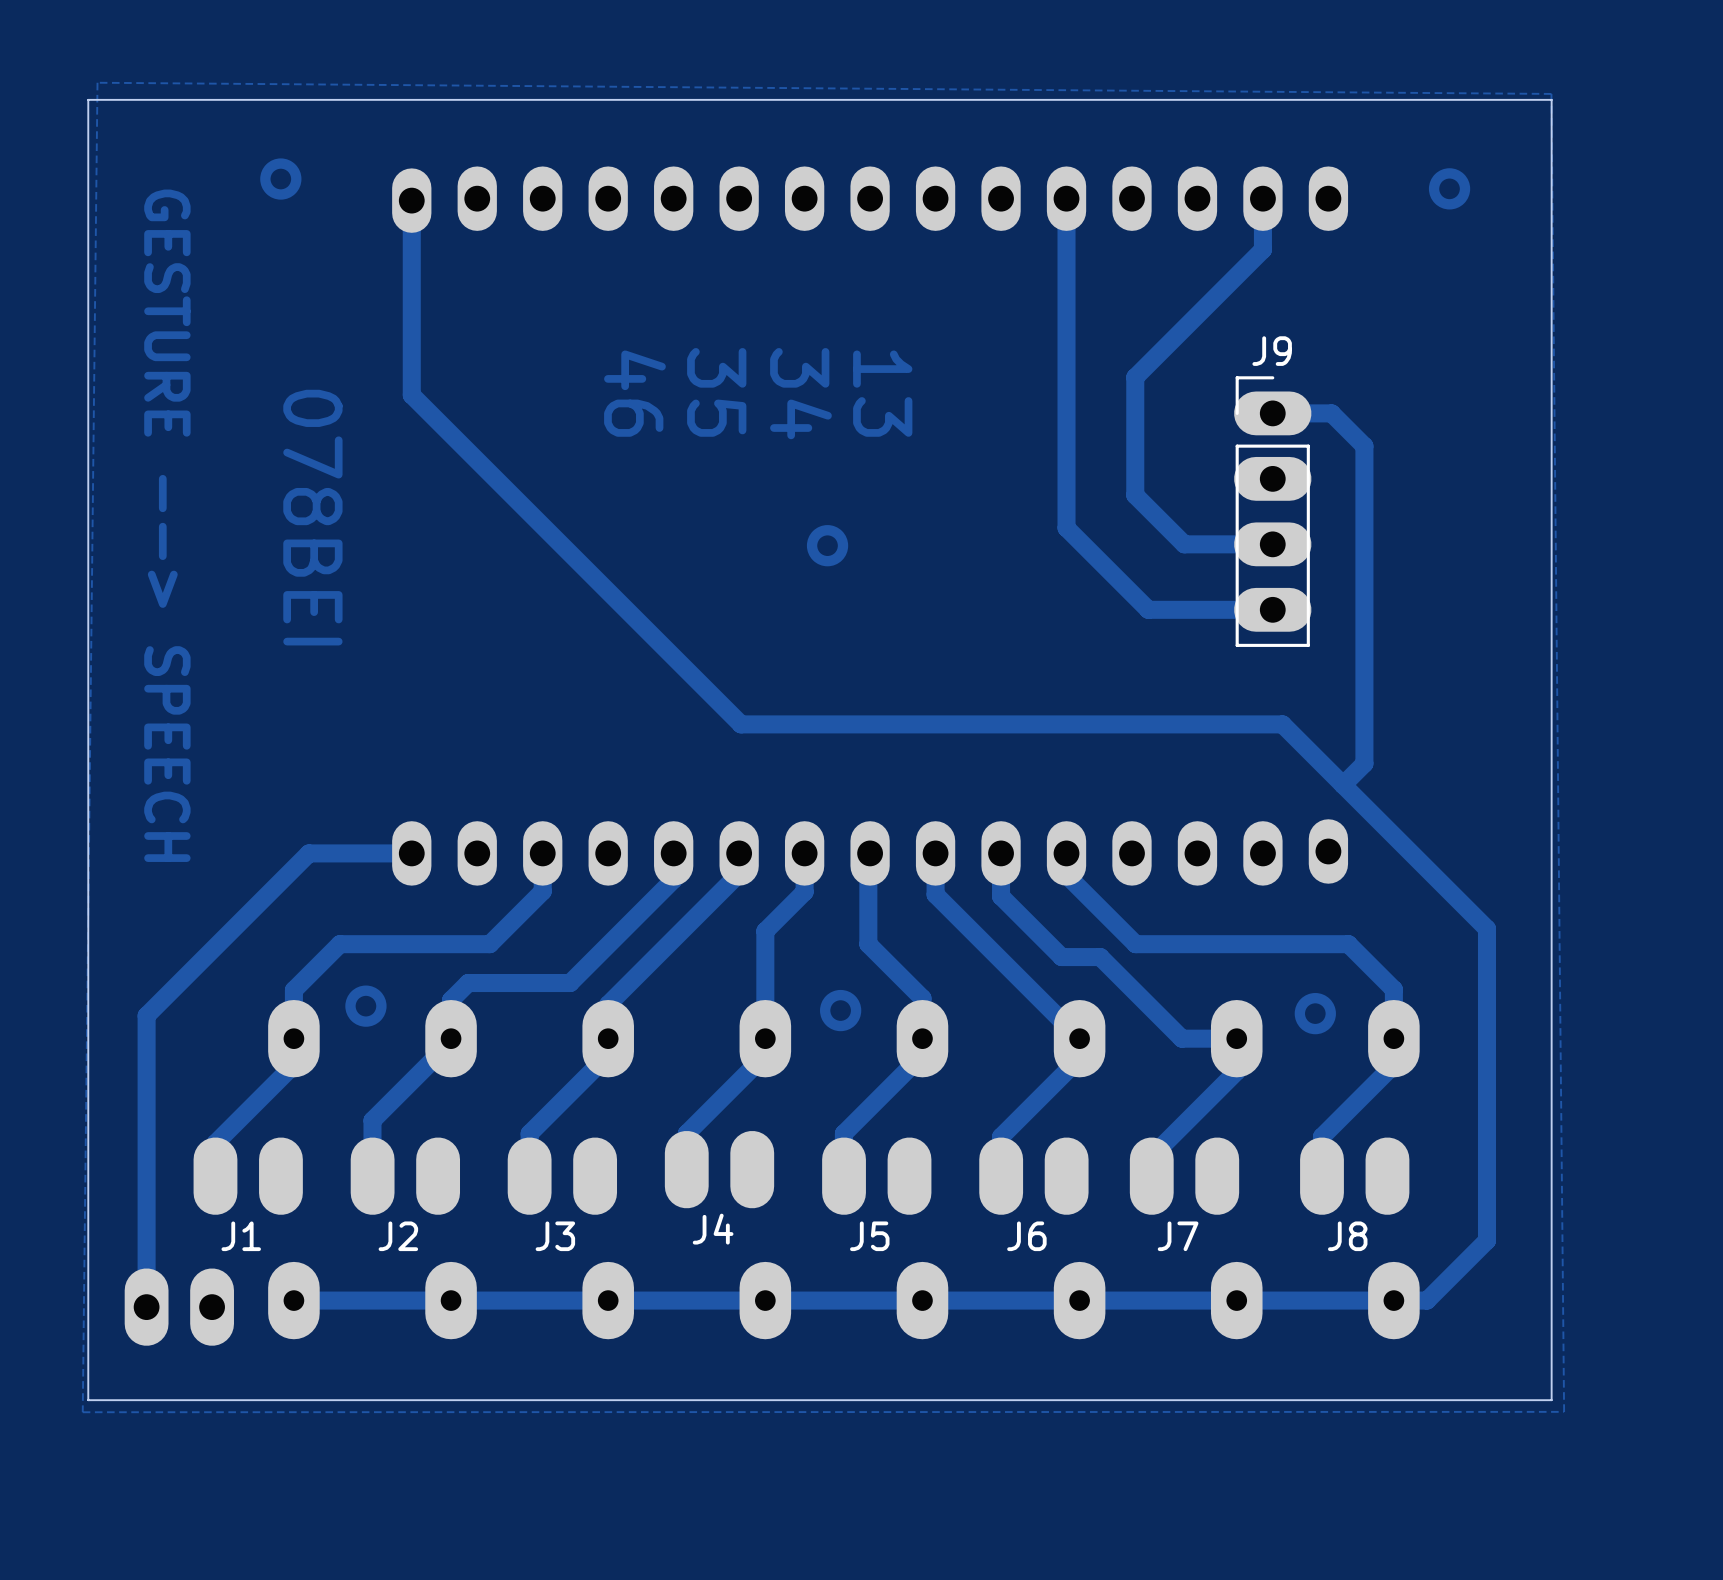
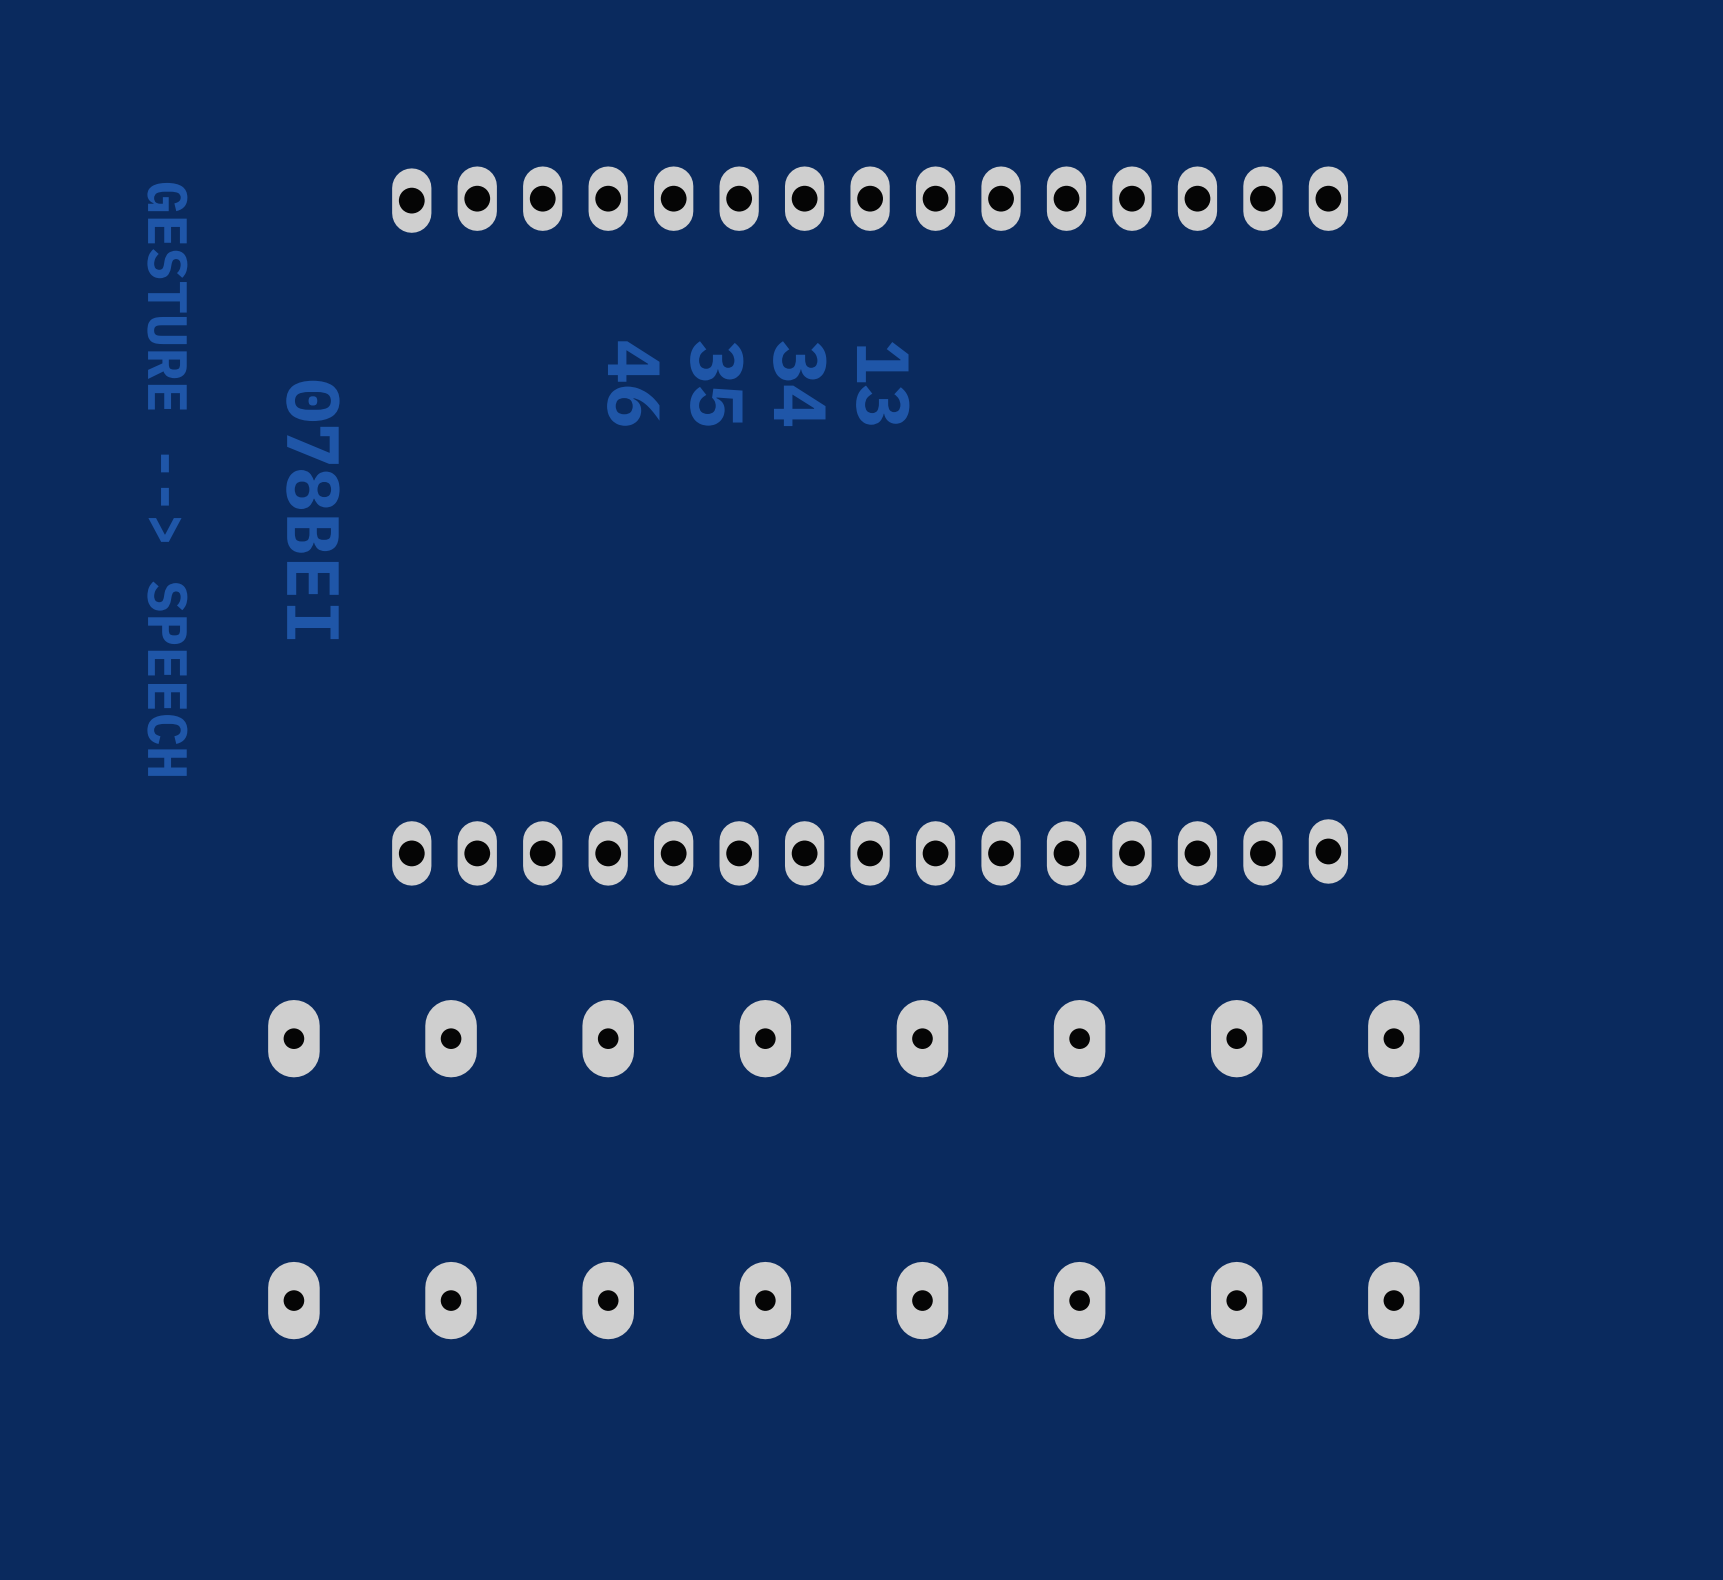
zone outline: (97, 82) (1551, 93) (1564, 1411) (82, 1412) (97, 82) -> none
board edge: (1551, 99) (88, 99) (88, 1400) (1551, 1400) (1551, 99) -> none
drawing: [260, 158, 302, 200] -> none
drawing: [1428, 168, 1471, 210] -> none
track: (1066, 198) (1066, 527) (1148, 609) (1272, 609) -> none
track: (1262, 198) (1262, 249) (1135, 377) (1135, 495) (1184, 544) (1272, 544) -> none
track: (411, 200) (411, 395) (741, 724) (1282, 724) (1486, 928) (1486, 1240) (1427, 1300) (293, 1300) -> none
track: (1272, 413) (1331, 413) (1364, 446) (1364, 763) (1343, 784) -> none
J9: (1272, 511) -> none
drawing: [806, 525, 849, 567] -> none
track: (411, 853) (308, 853) (146, 1015) (146, 1307) -> none
track: (542, 853) (542, 891) (489, 944) (339, 944) (293, 990) (293, 1064) (215, 1143) (215, 1176) -> none
track: (673, 853) (673, 879) (570, 983) (468, 983) (451, 1000) (451, 1041) (372, 1120) (372, 1176) -> none
track: (739, 853) (739, 873) (608, 1004) (608, 1055) (529, 1133) (529, 1176) -> none
track: (804, 853) (804, 891) (765, 931) (765, 1055) (686, 1133) (686, 1176) -> none
track: (870, 853) (868, 855) (868, 944) (922, 998) (922, 1055) (843, 1133) (843, 1176) -> none
track: (935, 853) (935, 894) (1079, 1038) (1079, 1058) (1001, 1136) (1001, 1176) -> none
track: (1001, 853) (1001, 896) (1061, 957) (1100, 957) (1181, 1038) (1236, 1038) (1236, 1071) (1158, 1149) (1158, 1176) -> none
track: (1066, 853) (1066, 874) (1135, 944) (1348, 944) (1393, 989) (1393, 1064) (1321, 1136) (1321, 1176) -> none
drawing: [345, 985, 387, 1027] -> none
drawing: [820, 989, 862, 1032] -> none
drawing: [1294, 993, 1336, 1035] -> none
J4: (719, 1169) -> none
J1: (248, 1176) -> none
J2: (405, 1176) -> none
J3: (562, 1176) -> none
J5: (876, 1176) -> none
J6: (1033, 1176) -> none
J7: (1184, 1176) -> none
J8: (1354, 1176) -> none
part: (179, 1307) -> none

